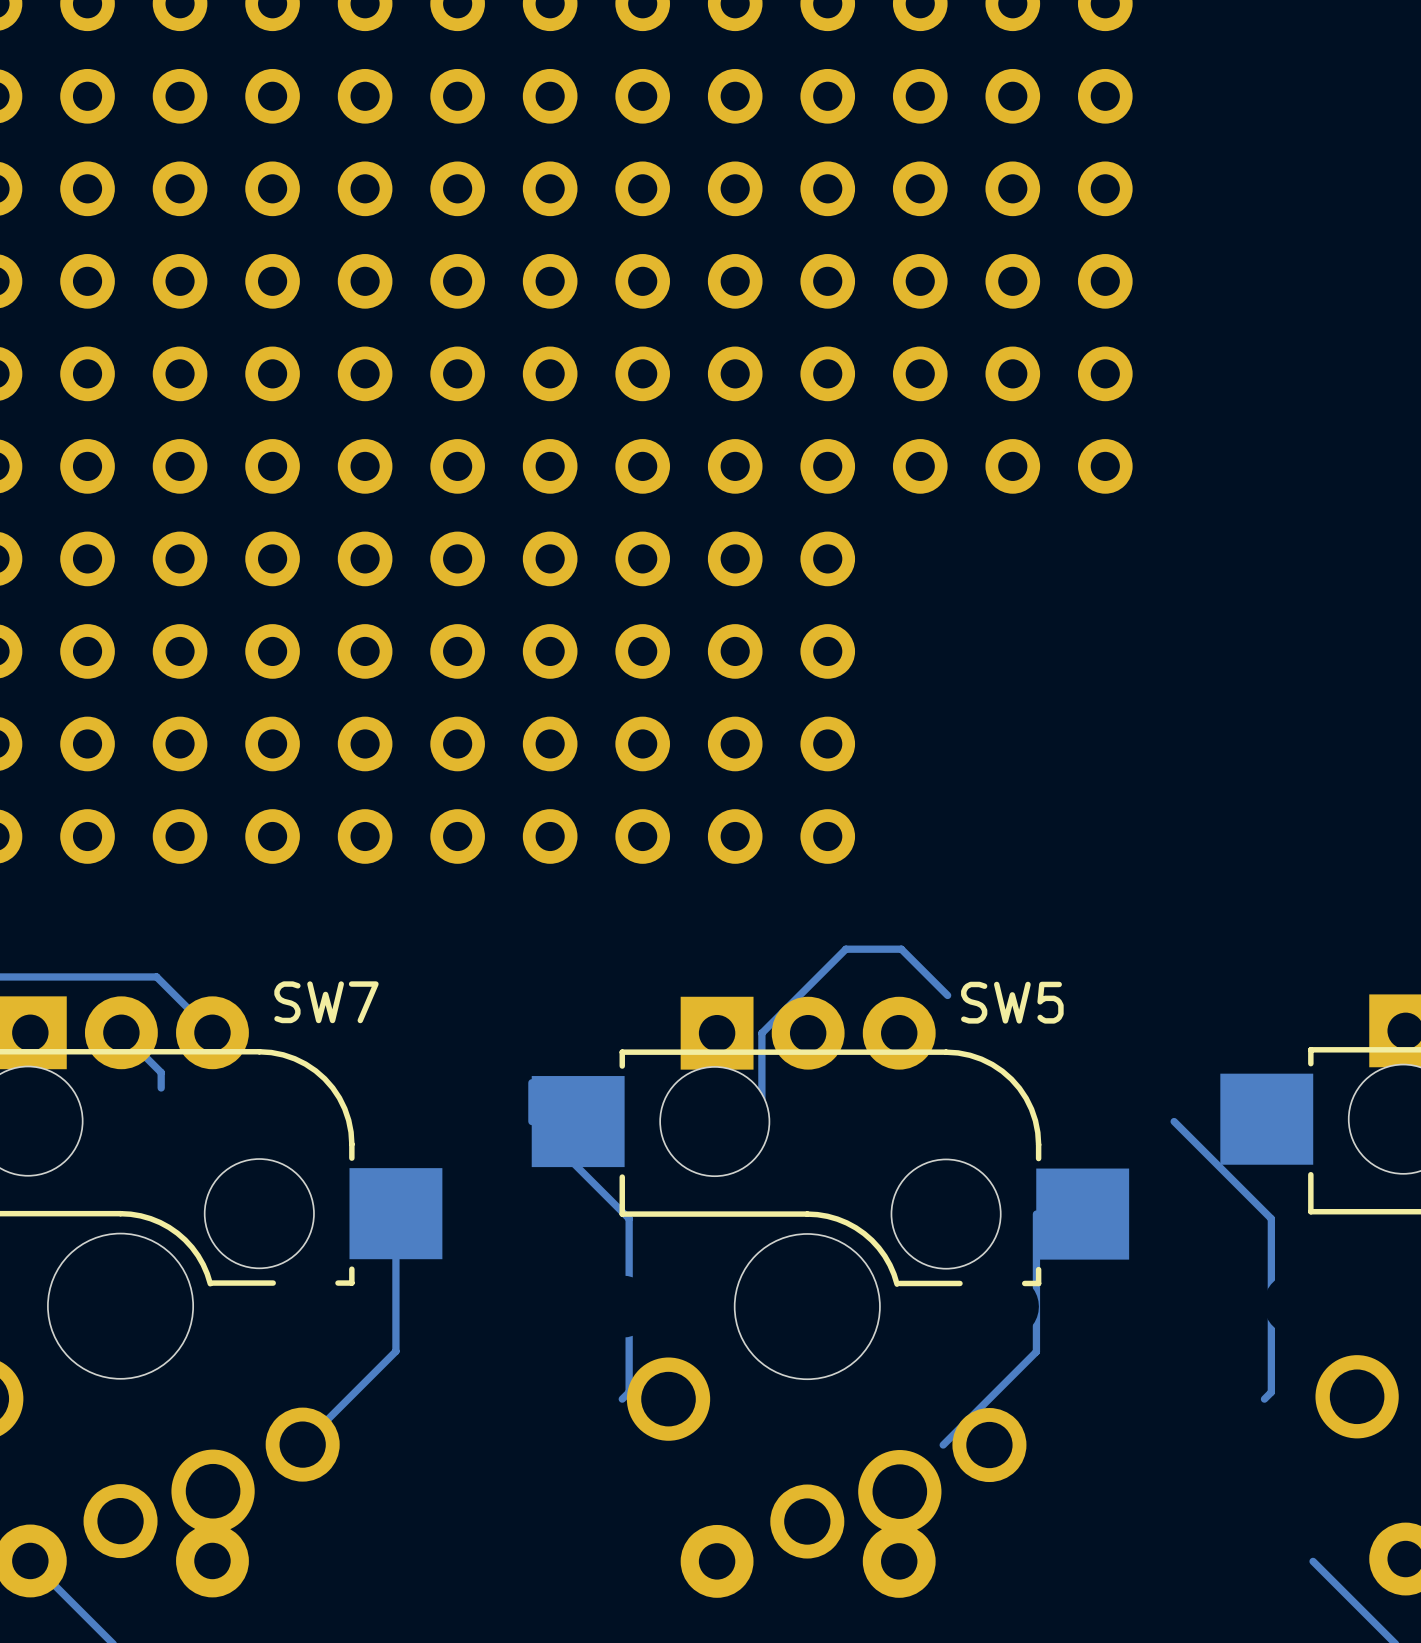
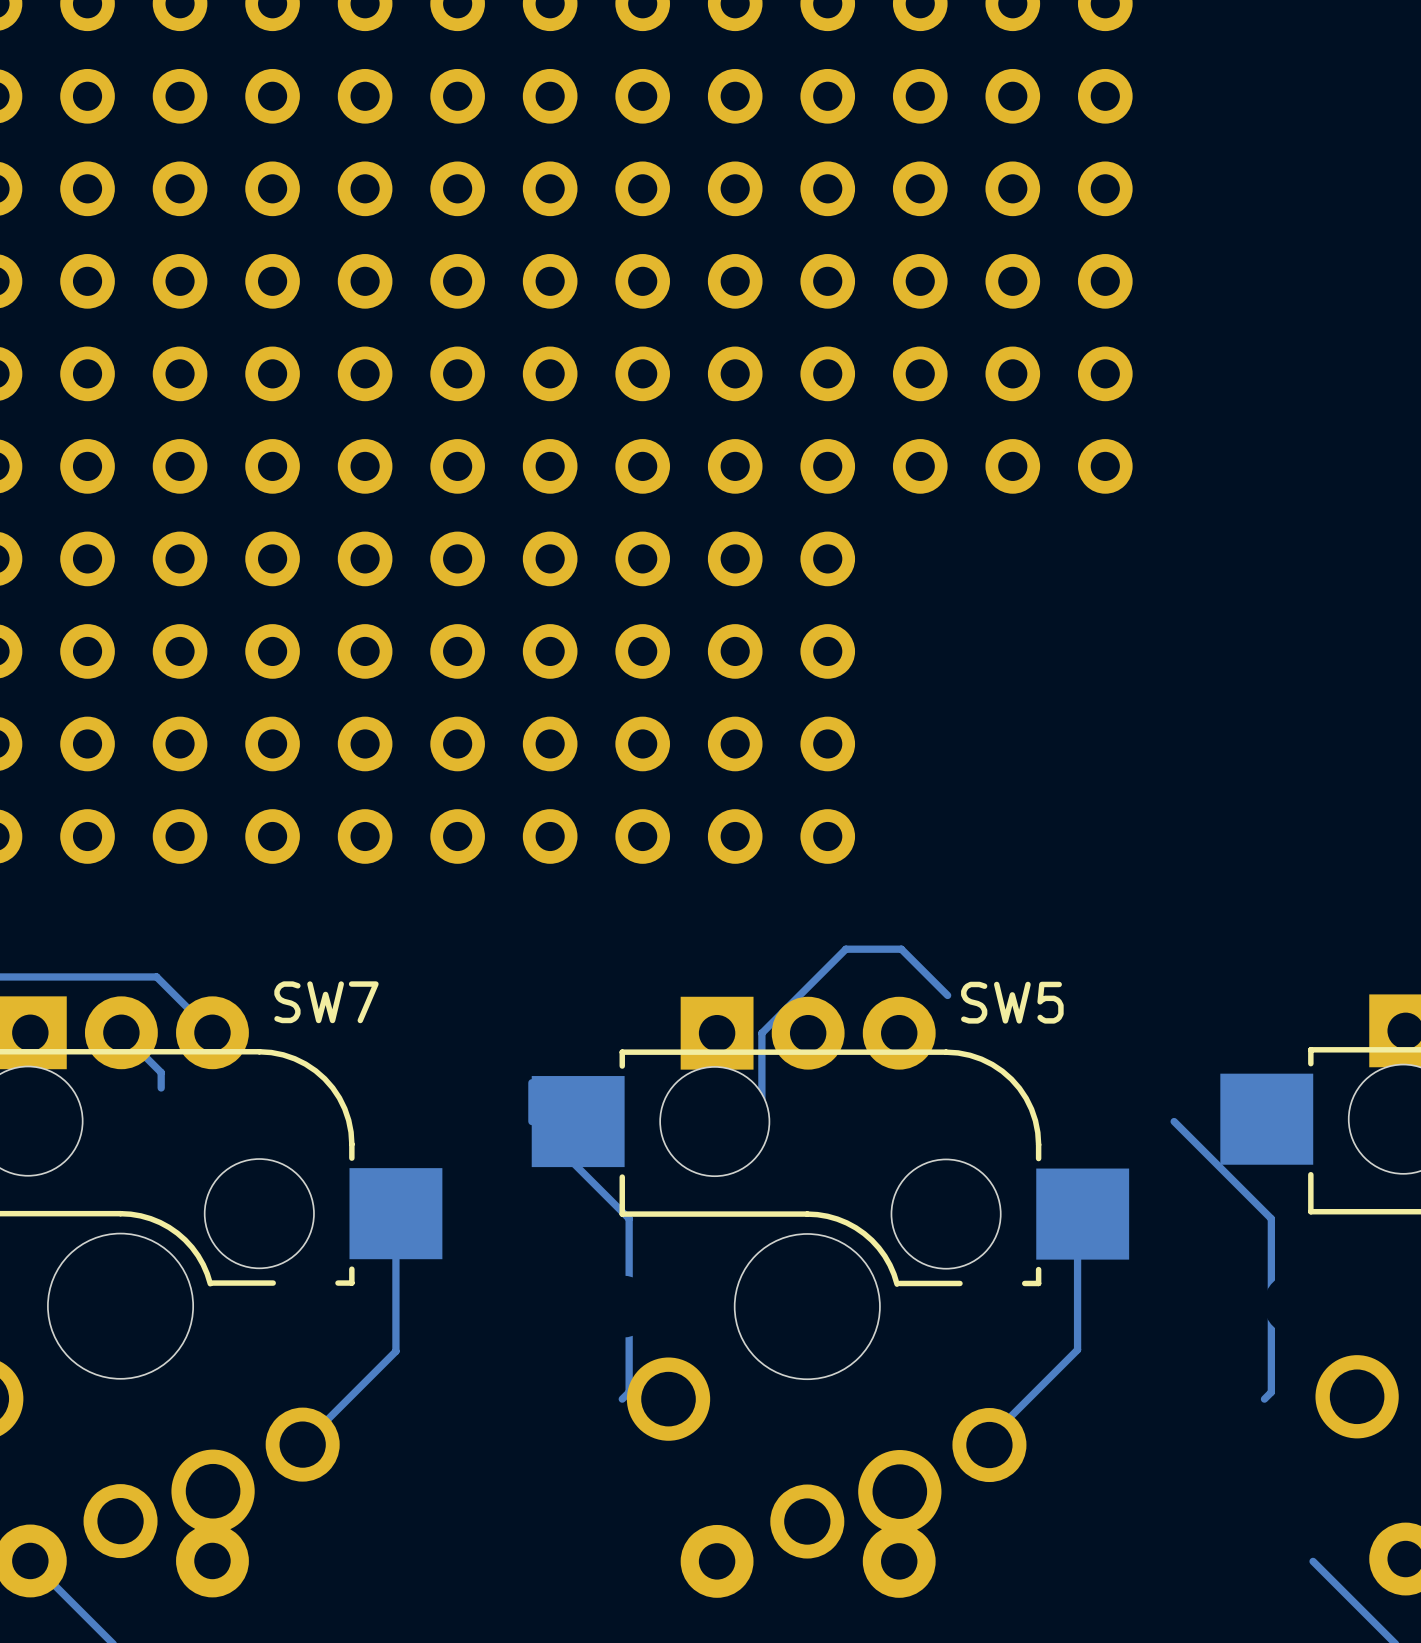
track: (1036, 1214) (1036, 1351) (943, 1445) -> (1077, 1212) (1077, 1349) (984, 1443)

